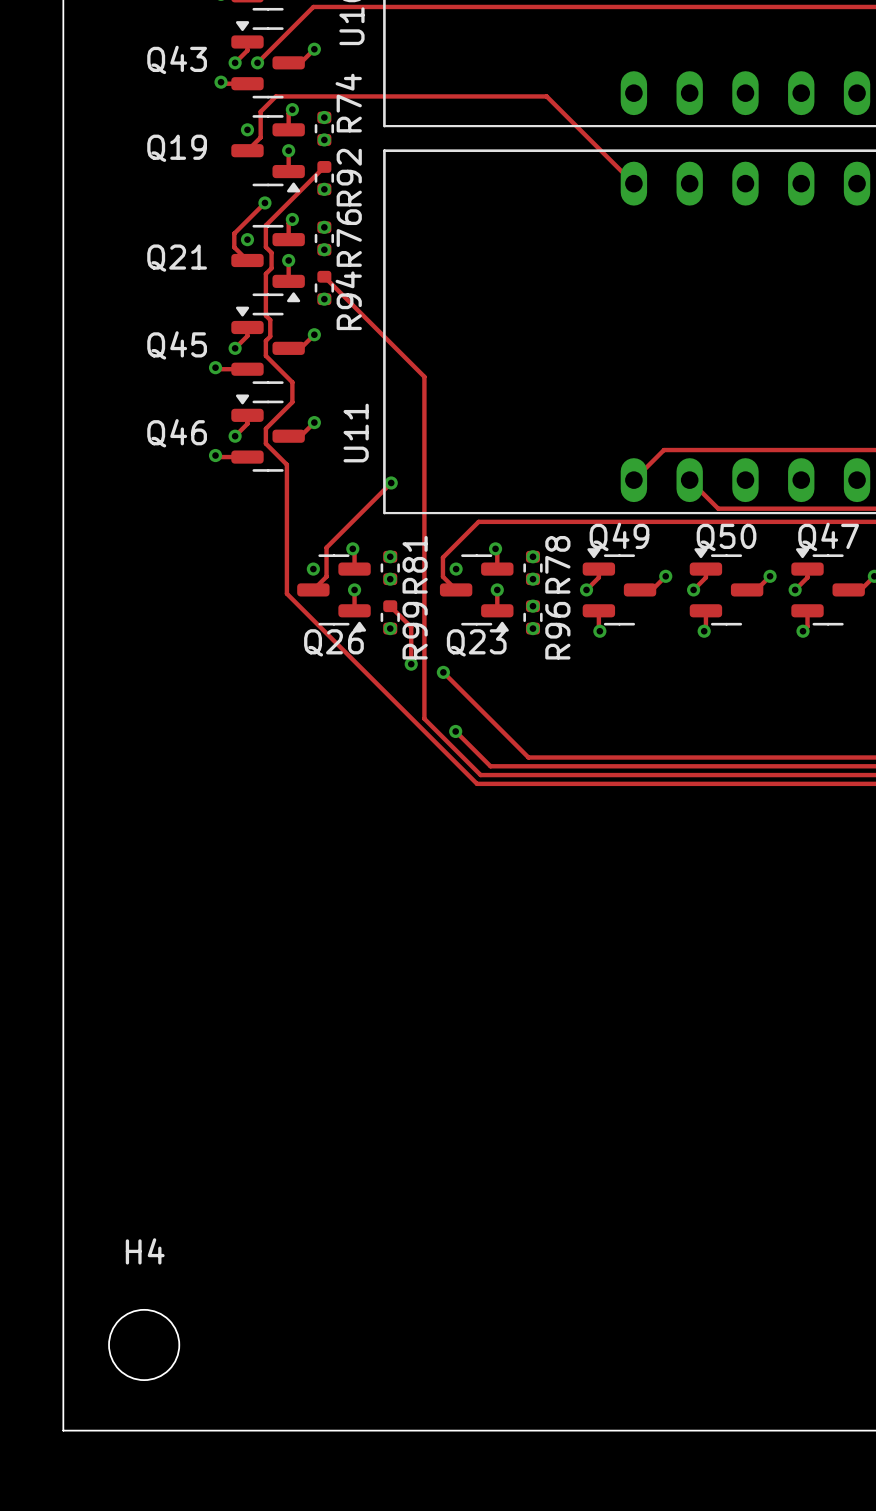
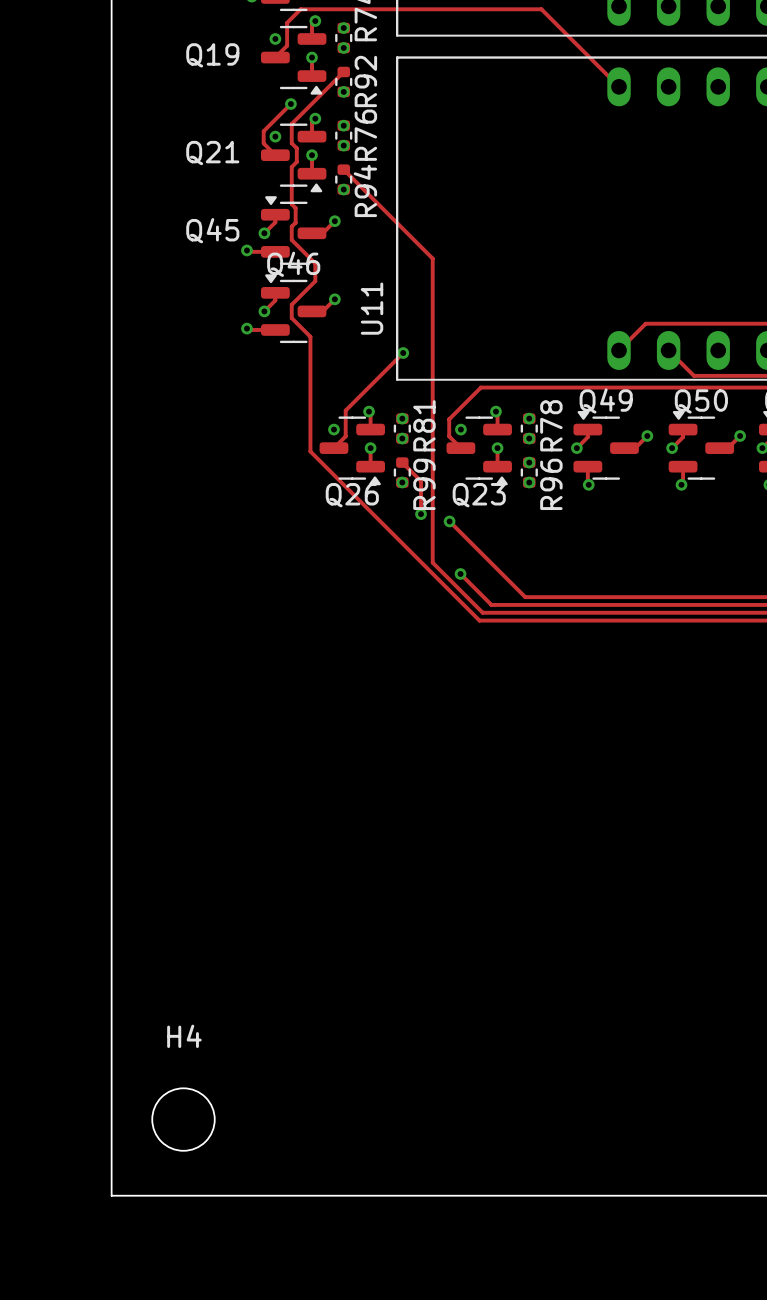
Q46 name position: Q46 (177, 433) -> Q46 (293, 264)

